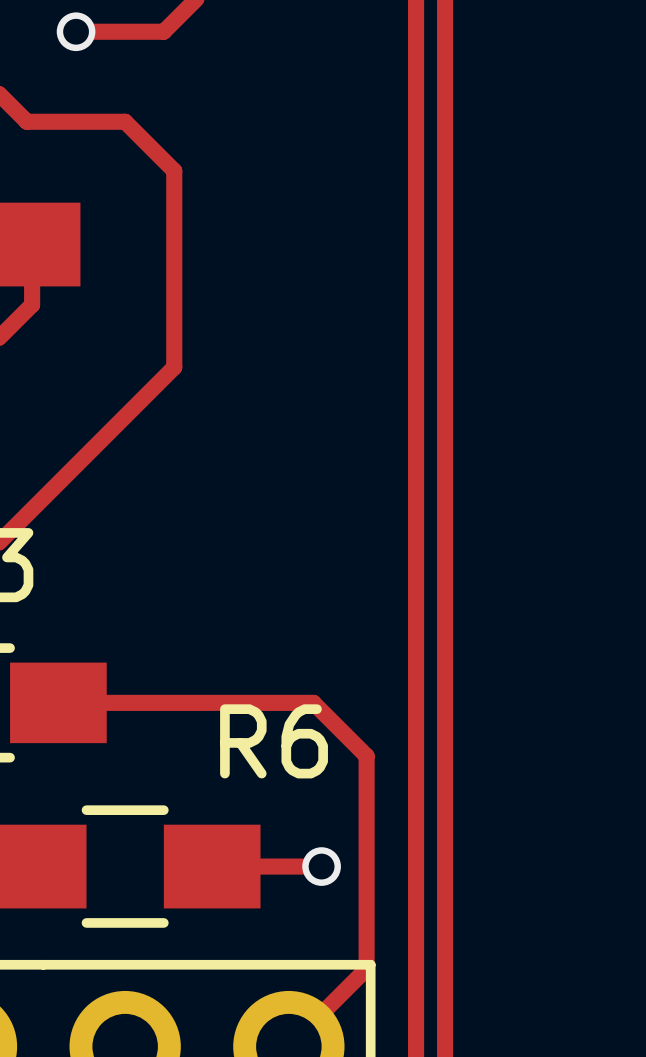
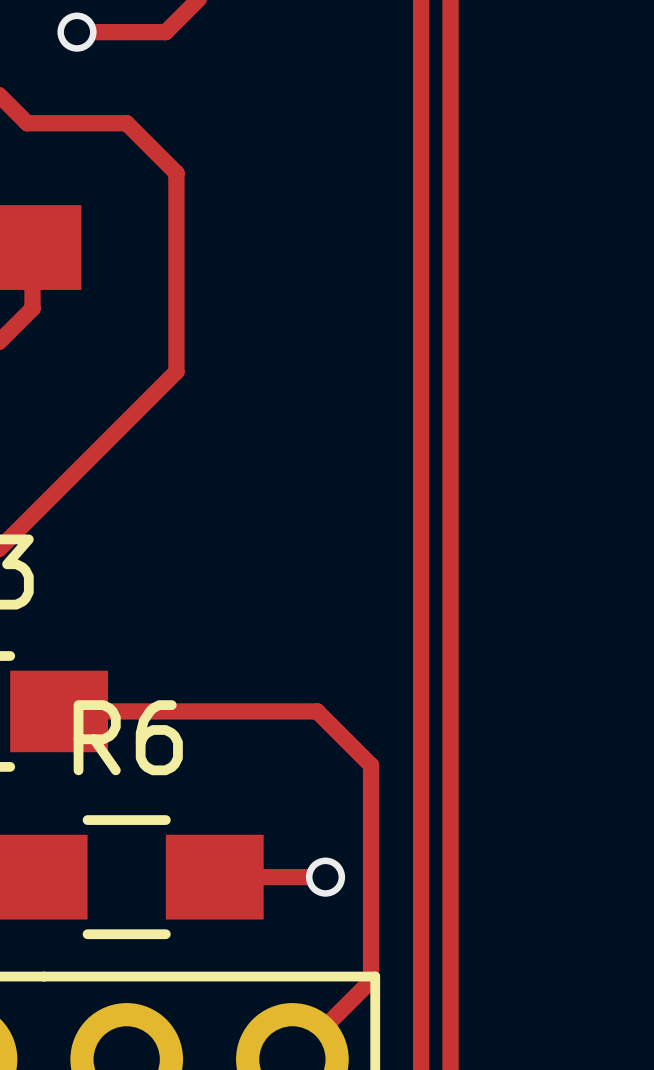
R6 name position: R6 (274, 741) -> R6 (128, 737)

